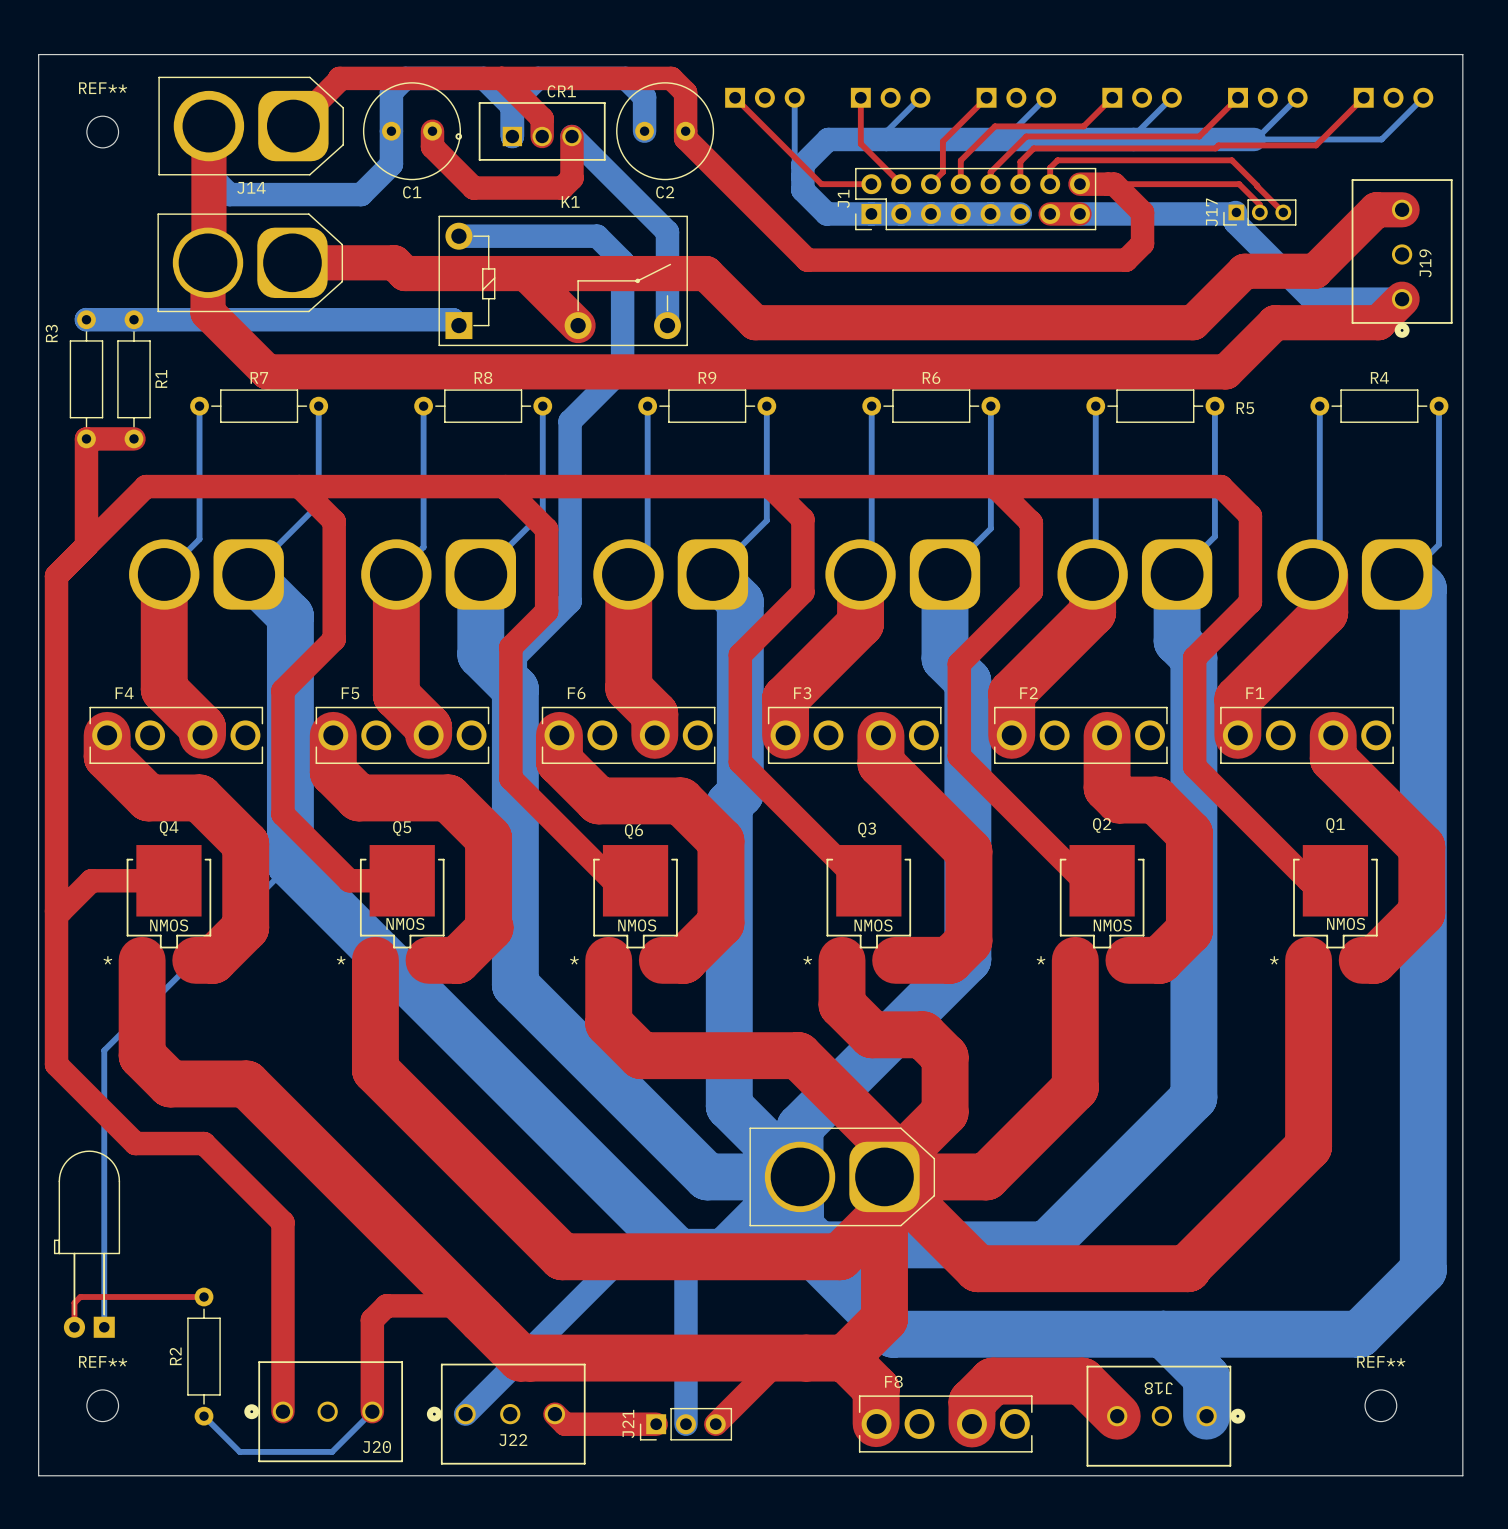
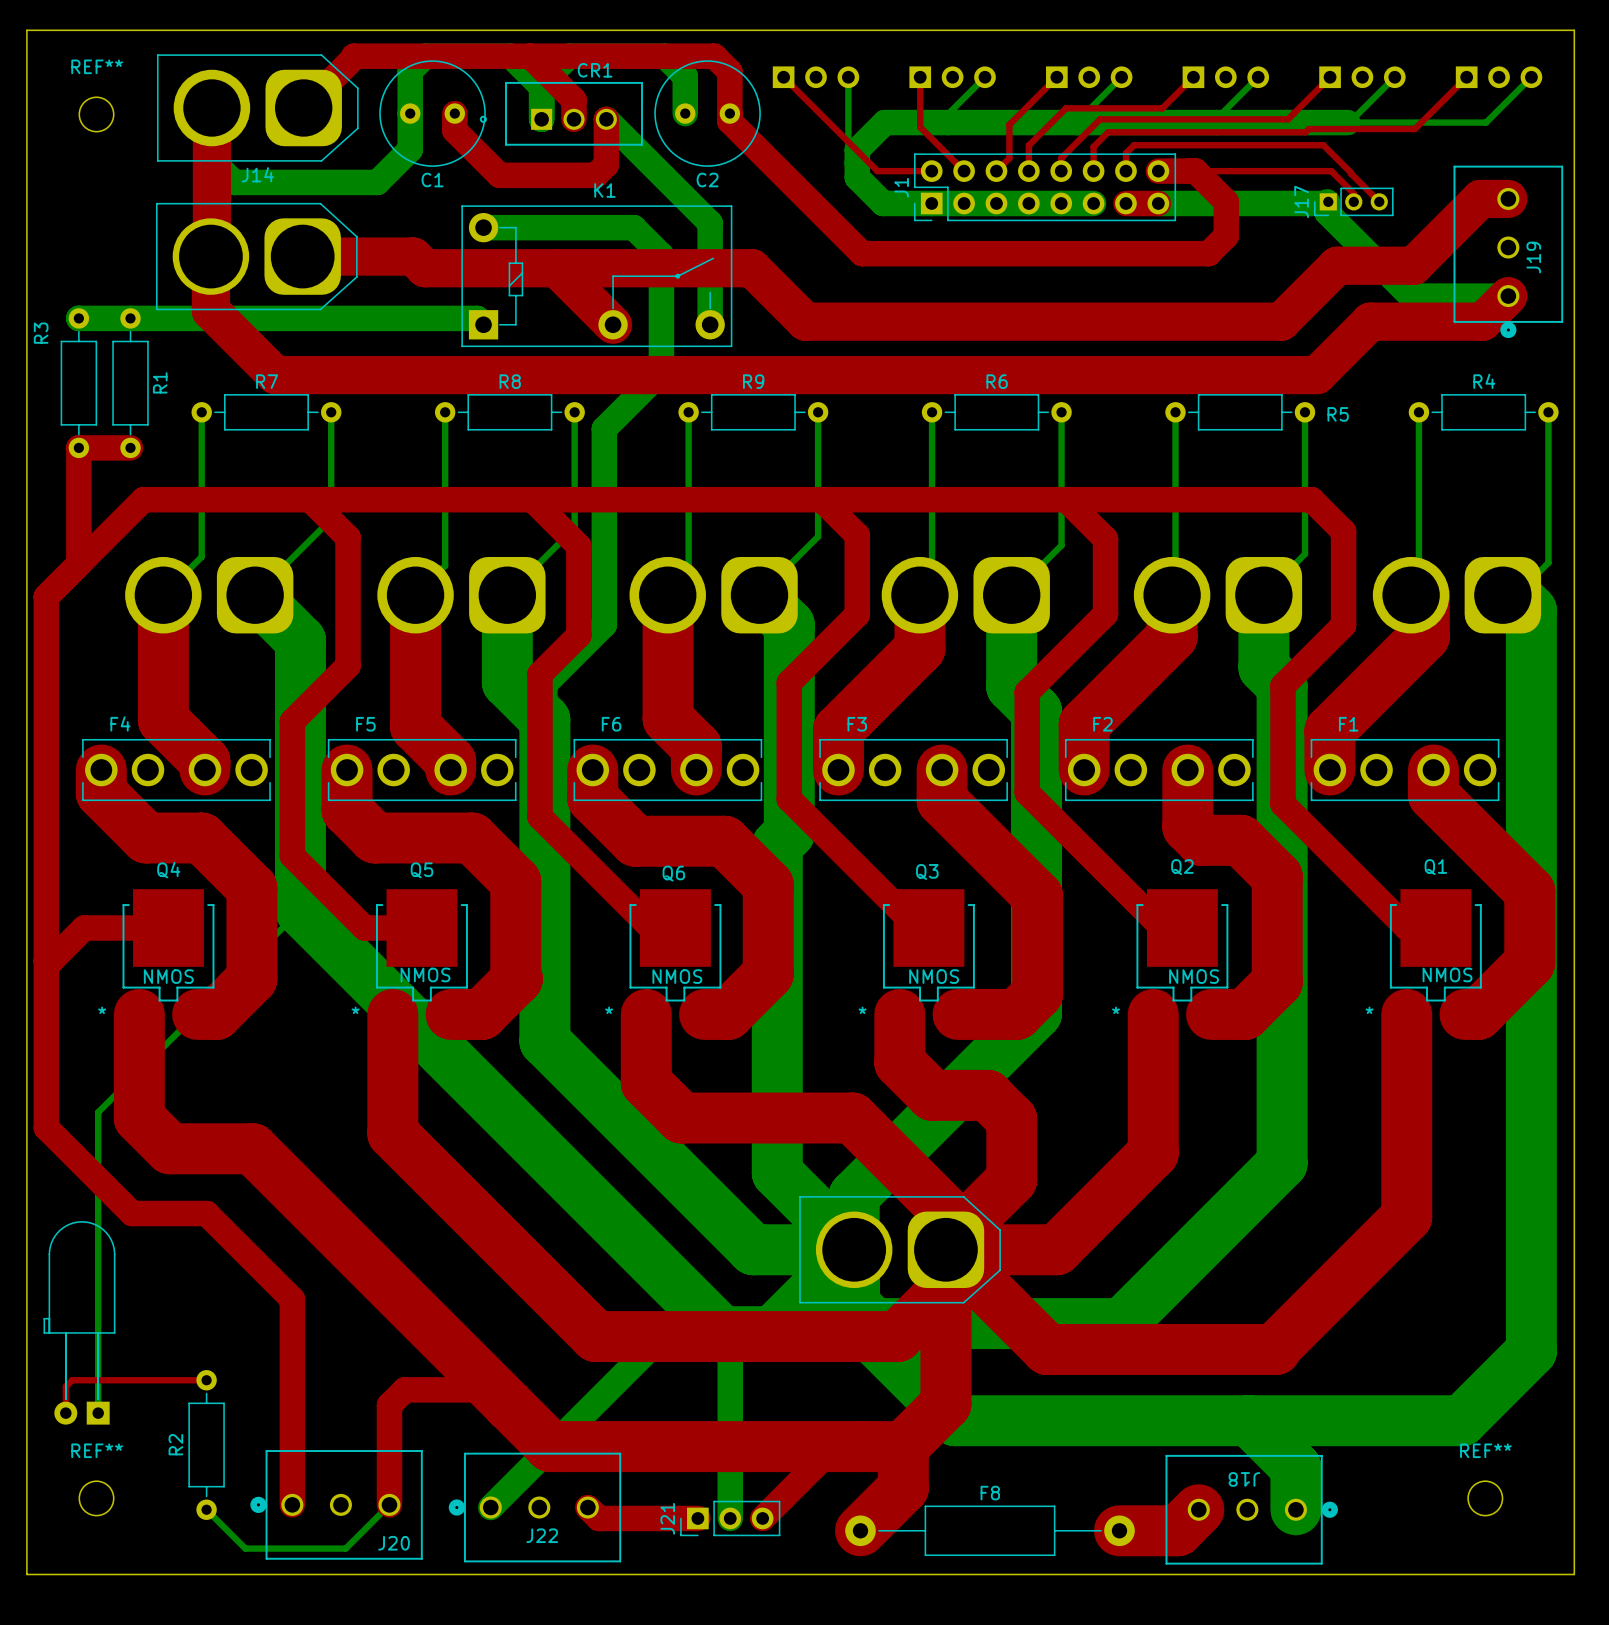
top track: (845, 1358) (876, 1388) (876, 1423) -> (903, 1446) (903, 1487) (860, 1530)
F8 name position: F8 (893, 1381) -> F8 (990, 1493)
F8 footprint: [858, 1395, 1033, 1453] -> [845, 1505, 1135, 1557]
top track: (1111, 1416) (1117, 1416) (1082, 1381) (992, 1381) (971, 1402) (971, 1423) -> none
top track: none -> (1198, 1509) (1177, 1530) (1119, 1530)

